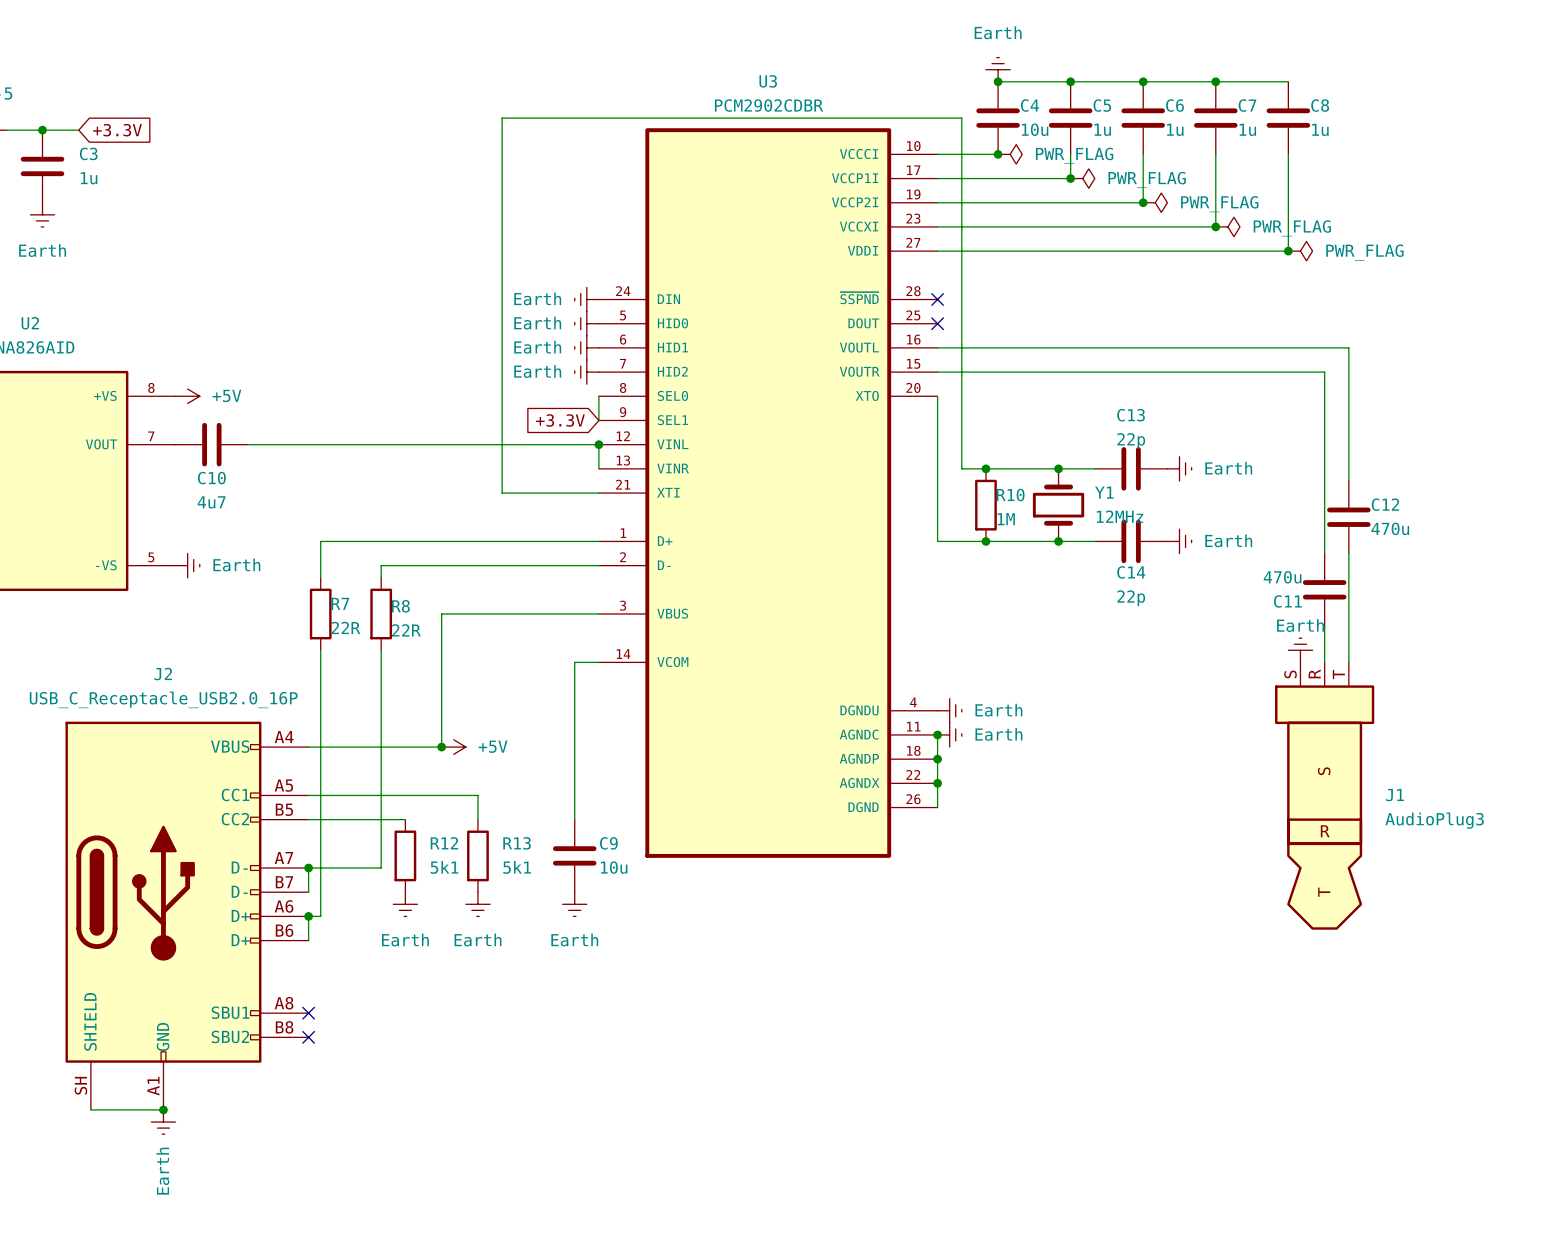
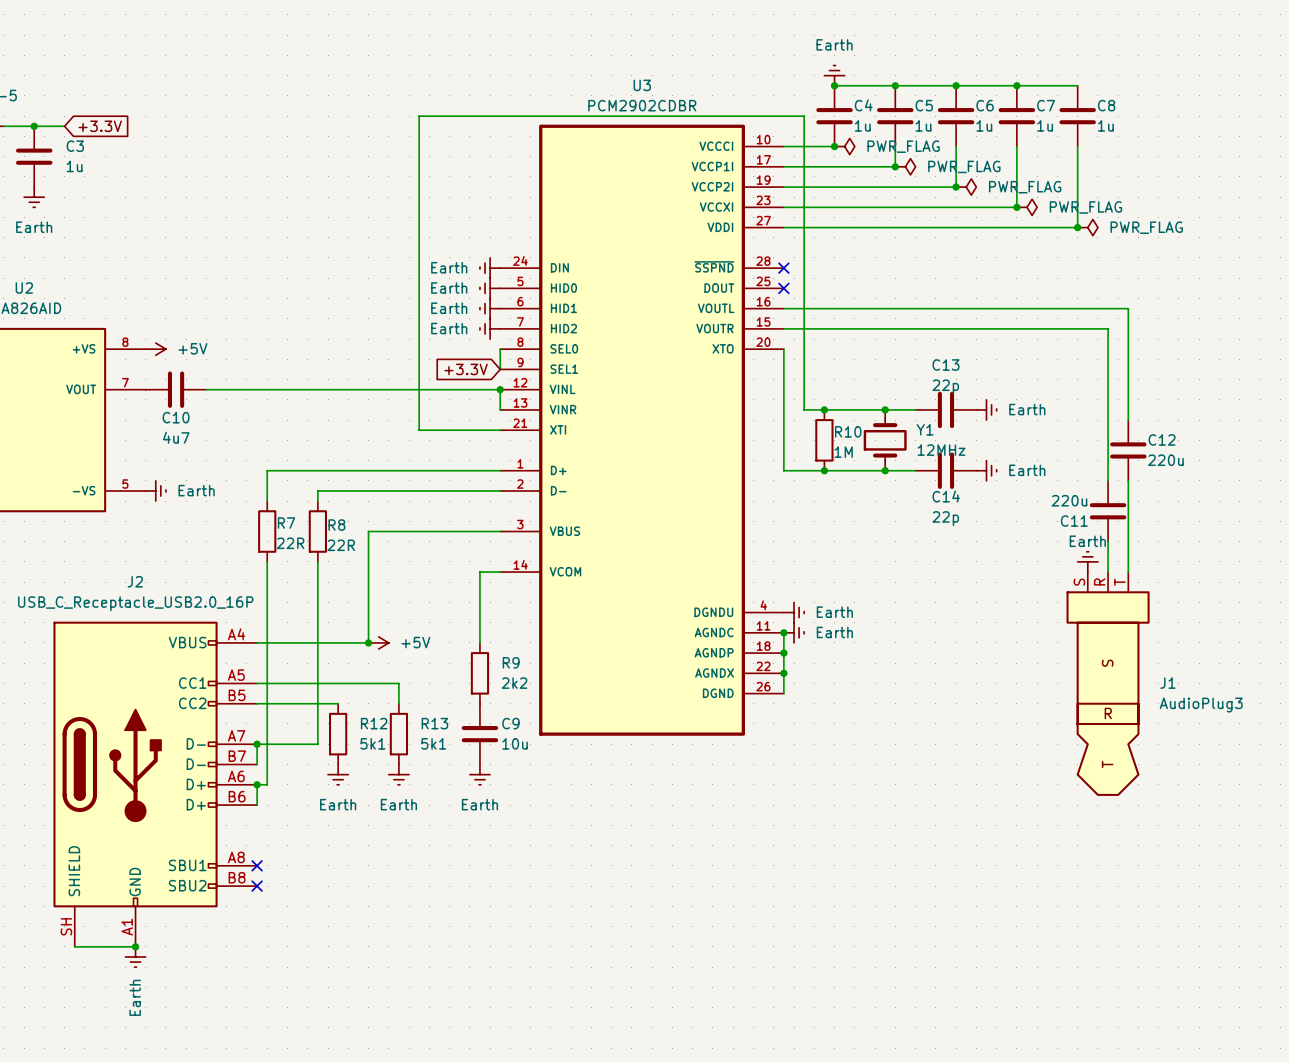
C4 value: 10u (1035, 129) -> 1u (862, 125)
C12 value: 470u (1390, 528) -> 220u (1165, 460)
C11 value: 470u (1282, 577) -> 220u (1069, 500)
wire: (574, 747) (574, 819) -> none
R9: none -> 2k2 (479, 673)

